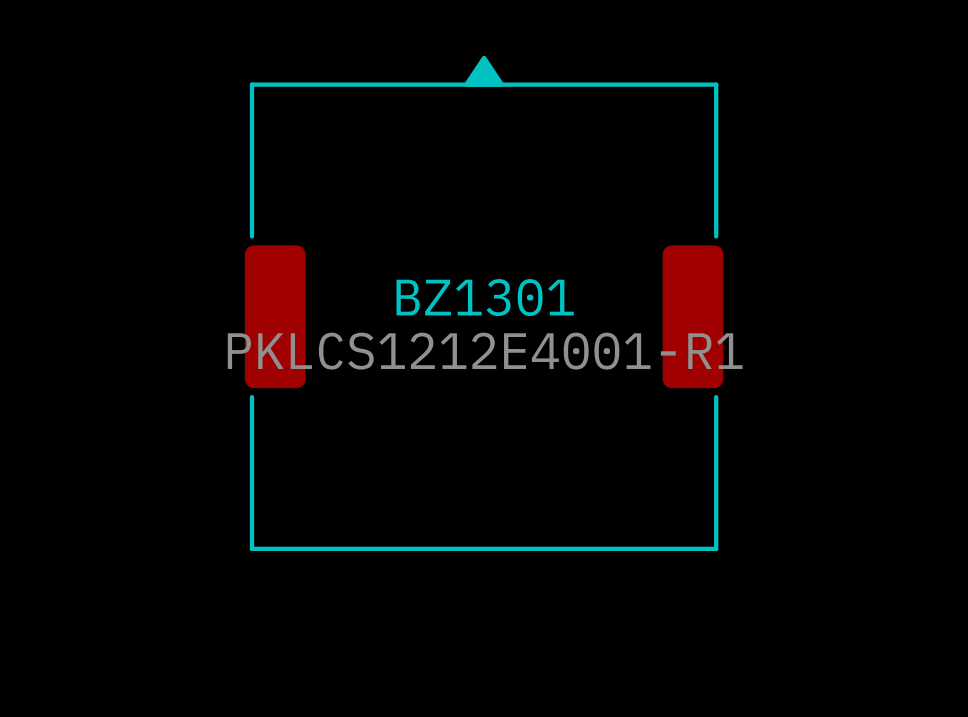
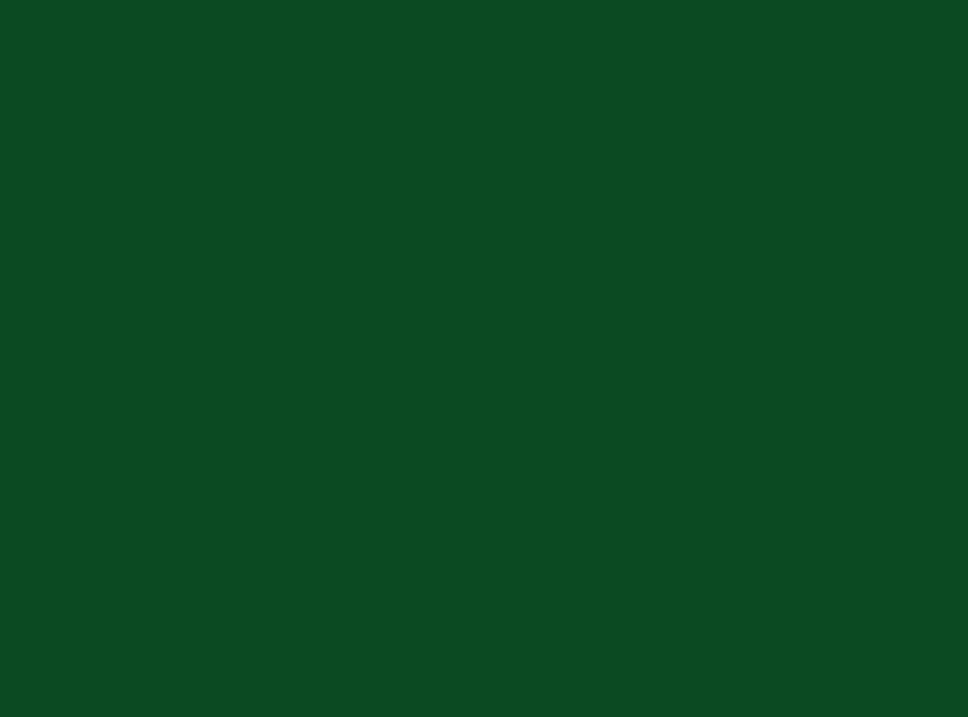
BZ1301: PKLCS1212E4001-R1 (484, 303) -> none

